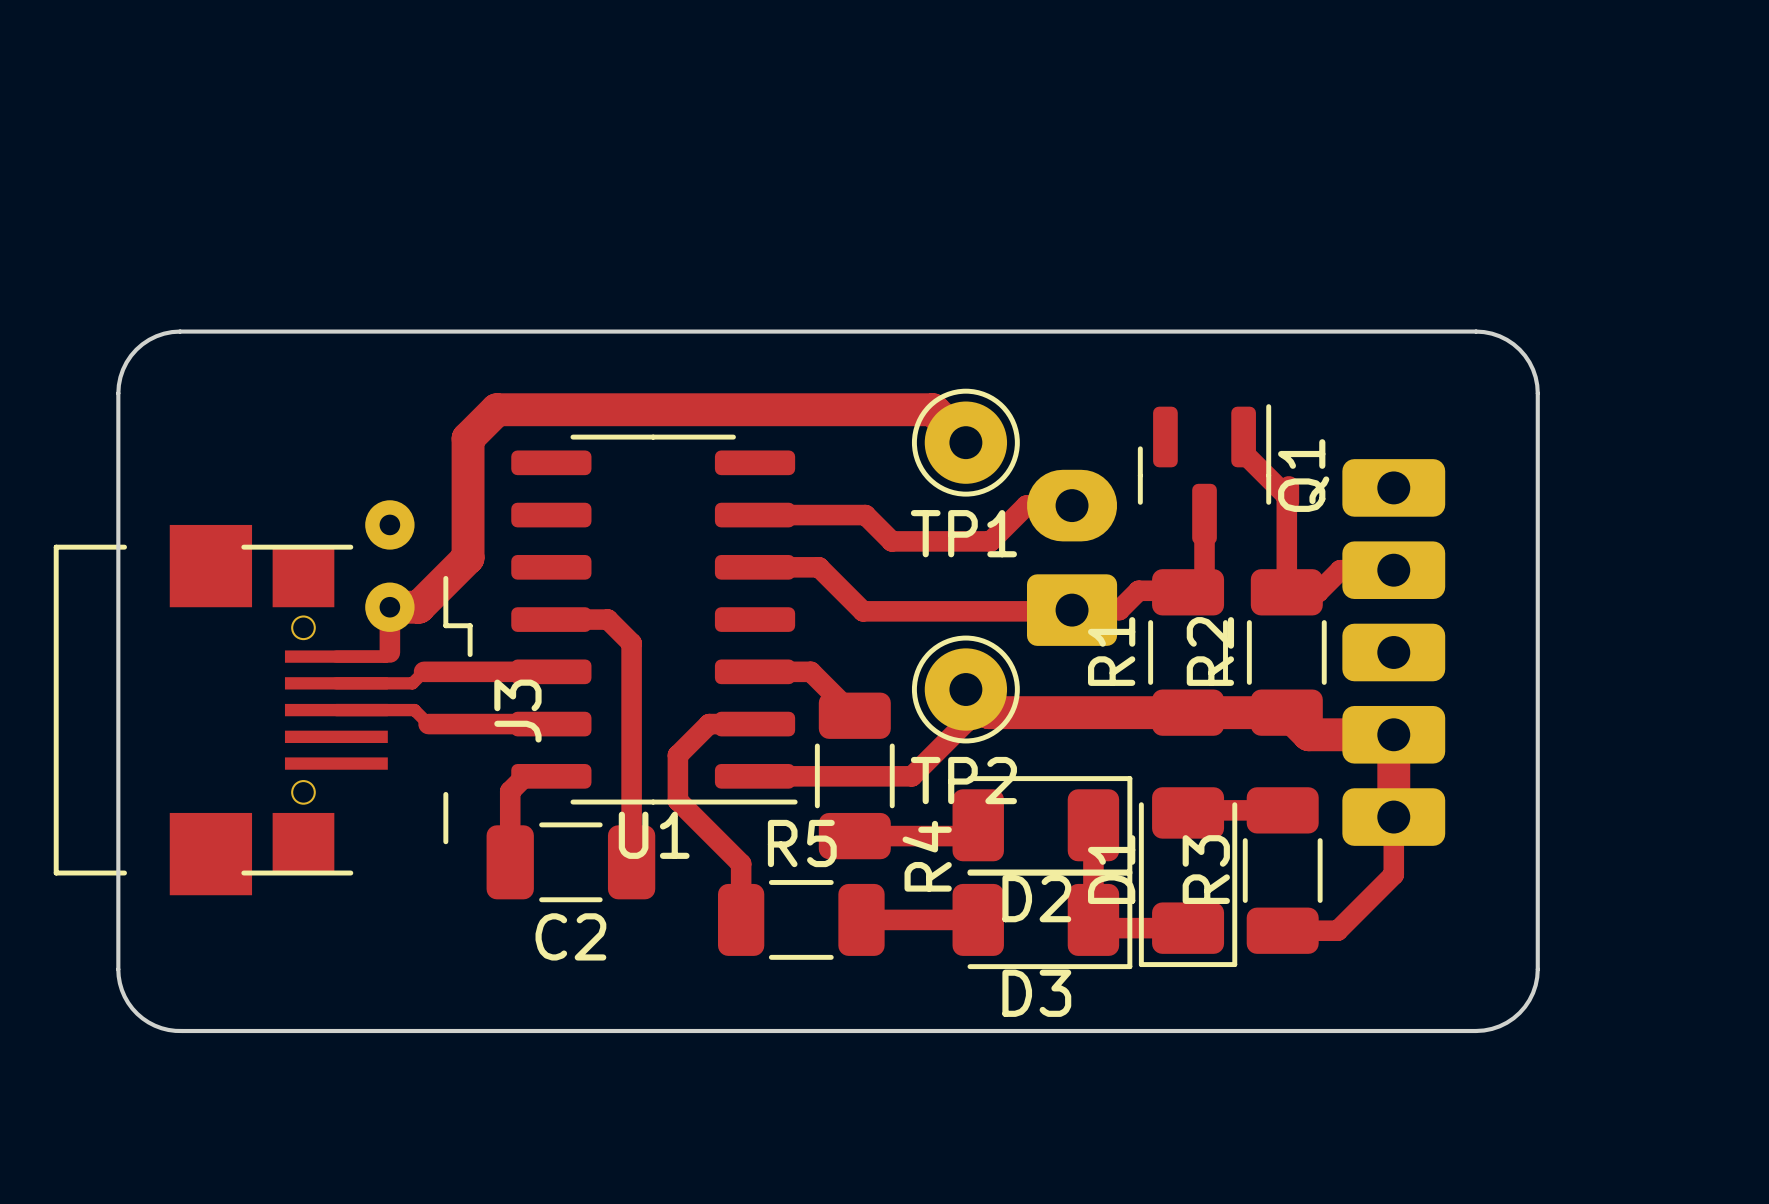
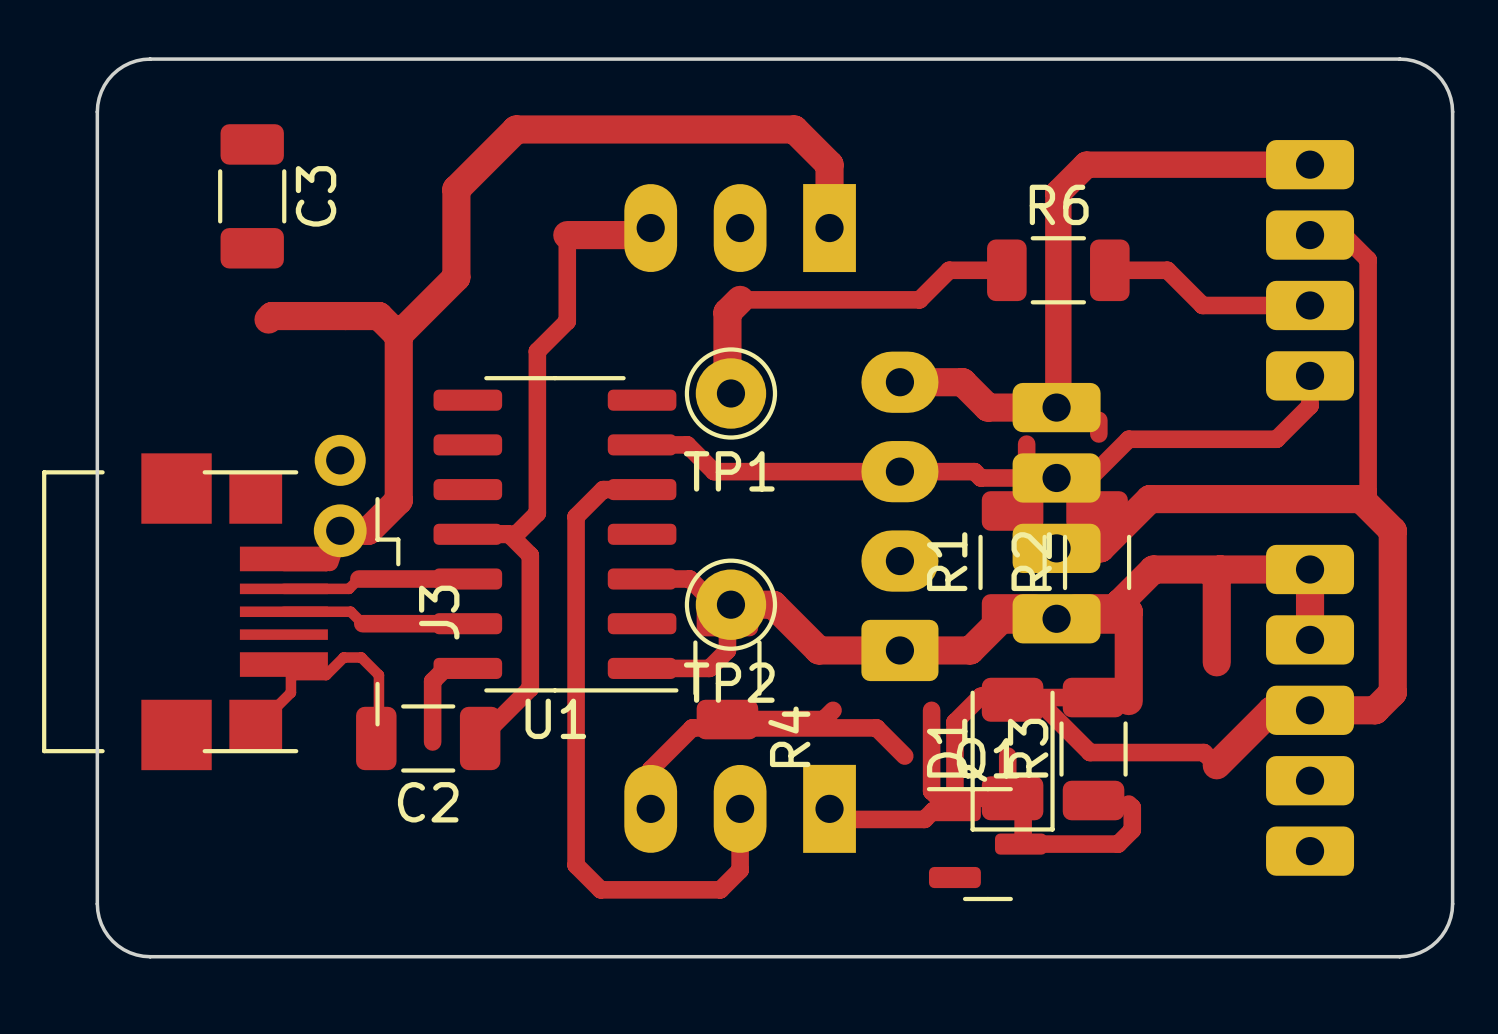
track: none -> (1310, 164) (1086, 164) (1058, 192) (1058, 405) (1056, 407) (987, 407) (962, 382) (899, 382)
C3: none -> (252, 196)
part: none -> (740, 228)
track: none -> (829, 228) (829, 164) (794, 129) (516, 129) (456, 189) (456, 277) (398, 335)
track: none -> (1310, 235) (1343, 235) (1368, 259) (1368, 492) (1361, 499)
track: none -> (1006, 270) (949, 270) (919, 299) (740, 299) (727, 312) (727, 393)
R6: none -> (1058, 270)
track: none -> (1109, 270) (1167, 270) (1202, 305) (1310, 305)
part: none -> (1310, 270)
board edge: (118, 393) (123, 369) (136, 349) (156, 336) (180, 331) (1476, 331) (1499, 336) (1513, 344) (1525, 355) (1533, 369) (1537, 393) (1537, 969) (1533, 992) (1519, 1012) (1499, 1026) (1476, 1031) (175, 1030) (154, 1025) (142, 1018) (132, 1008) (121, 990) (118, 969) -> (97, 340) (97, 104) (104, 85) (112, 74) (129, 63) (143, 59) (1399, 59) (1420, 63) (1437, 74) (1445, 85) (1452, 104) (1452, 903) (1450, 917) (1445, 930) (1437, 941) (1426, 949) (1413, 954) (1399, 956) (143, 956) (129, 952) (117, 945) (108, 936) (101, 924) (97, 903) (97, 833)
track: (965, 442) (932, 409) (496, 409) (468, 438) (468, 557) (418, 607) (389, 607) (389, 652) -> (268, 319) (272, 316) (378, 316) (398, 335) (398, 500) (368, 530) (340, 530) (329, 562)
TP1 position: (965, 442) -> (730, 393)
track: (1243, 452) (1286, 496) (1286, 592) (1318, 592) (1340, 570) (1393, 570) -> none
Q1 rotation: 0° (1204, 474) -> 90° counterclockwise (986, 844)
Q1 position: (1204, 474) -> (986, 844)
part footprint: [365, 500, 415, 632] -> [313, 434, 367, 558]
track: (1072, 505) (1026, 505) (990, 541) (891, 541) (865, 515) (807, 515) -> (1310, 375) (1310, 405) (1276, 439) (1128, 439) (1090, 477) (980, 477) (974, 471) (714, 471) (687, 444)
J3 footprint: [53, 524, 473, 896] -> [42, 453, 401, 771]
part: (1072, 557) -> none
track: (755, 567) (819, 567) (863, 611) (1119, 610) (1138, 590) (1186, 590) -> none
track: none -> (1361, 499) (1392, 530) (1392, 692) (1375, 710) (1271, 710) (1216, 765) (1203, 752) (1090, 752) (1033, 696) (980, 696) (954, 722) (954, 810) (933, 810) (924, 819) (840, 819) (829, 808)
track: none -> (1361, 499) (1149, 499) (1100, 548) (1056, 548) (1075, 548)
part: none -> (1056, 513)
part: none -> (899, 516)
track: none -> (509, 534) (530, 555) (530, 688) (480, 738)
track: (607, 619) (631, 643) (631, 862) -> (516, 534) (537, 513) (537, 351) (567, 321) (567, 235) (643, 235) (650, 228)
part position: (1393, 652) -> (1310, 710)
track: none -> (1220, 569) (1216, 573) (1216, 662)
TP2 position: (965, 689) -> (730, 604)
track: none -> (1119, 602) (1128, 611) (1128, 701)
track: (755, 724) (709, 724) (677, 755) -> (642, 489) (603, 489) (576, 516) (576, 650)
track: (833, 776) (911, 776) (965, 722) (965, 689) (989, 712) (1286, 712) (1308, 734) (1393, 734) (1393, 874) (1337, 930) (1282, 930) -> (709, 668) (727, 650) (727, 604) (773, 604) (818, 650) (970, 650) (1002, 618) (1104, 618) (1153, 569) (1310, 569) (1310, 639)
track: (677, 800) (741, 863) (741, 919) -> (576, 689) (576, 865) (600, 889) (720, 889) (740, 870) (740, 808)
D2: (1042, 825) -> none
track: none -> (255, 726) (290, 692) (290, 675) (326, 675) (343, 657) (361, 657) (378, 675) (378, 735) (376, 738)
C2 position: (570, 862) -> (428, 738)
track: none -> (904, 756) (876, 727) (692, 727) (650, 769) (650, 808)
track: none -> (1007, 756) (1007, 782) (1023, 798) (1023, 841) (1020, 844) (1118, 844) (1132, 829) (1132, 807) (1128, 804)
R5: (801, 919) -> none
track: (861, 919) (978, 919) -> none
D3: (1042, 919) -> none
part: none -> (740, 808)

